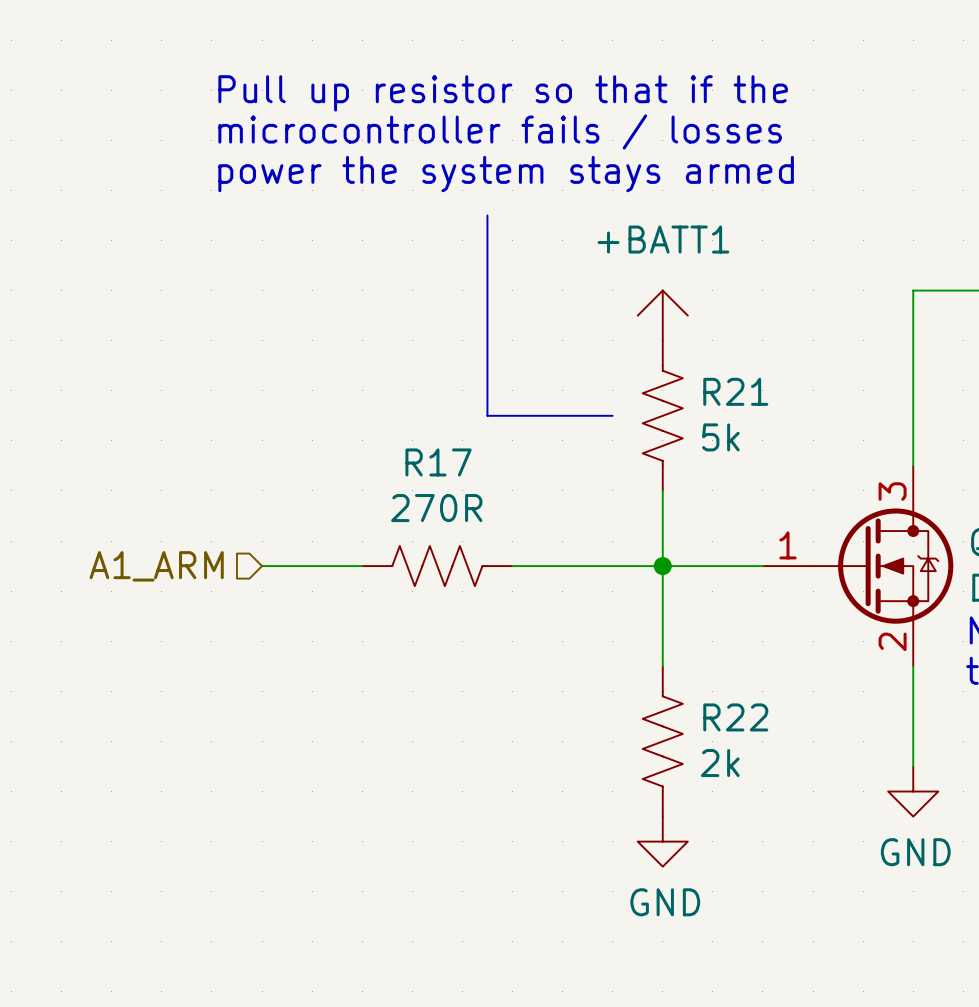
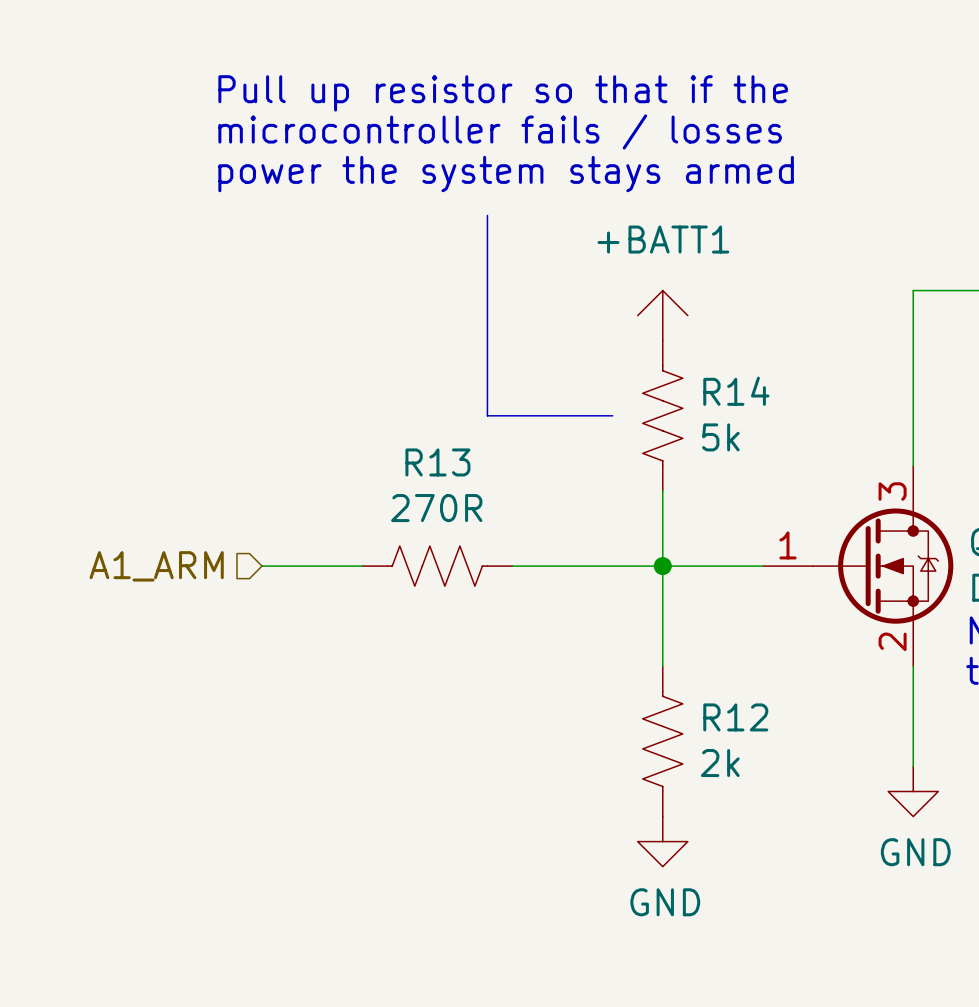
R21 name: R21 (735, 391) -> R14 (736, 391)
R17 name: R17 (438, 462) -> R13 (437, 462)
R22 name: R22 (735, 717) -> R12 (735, 717)

